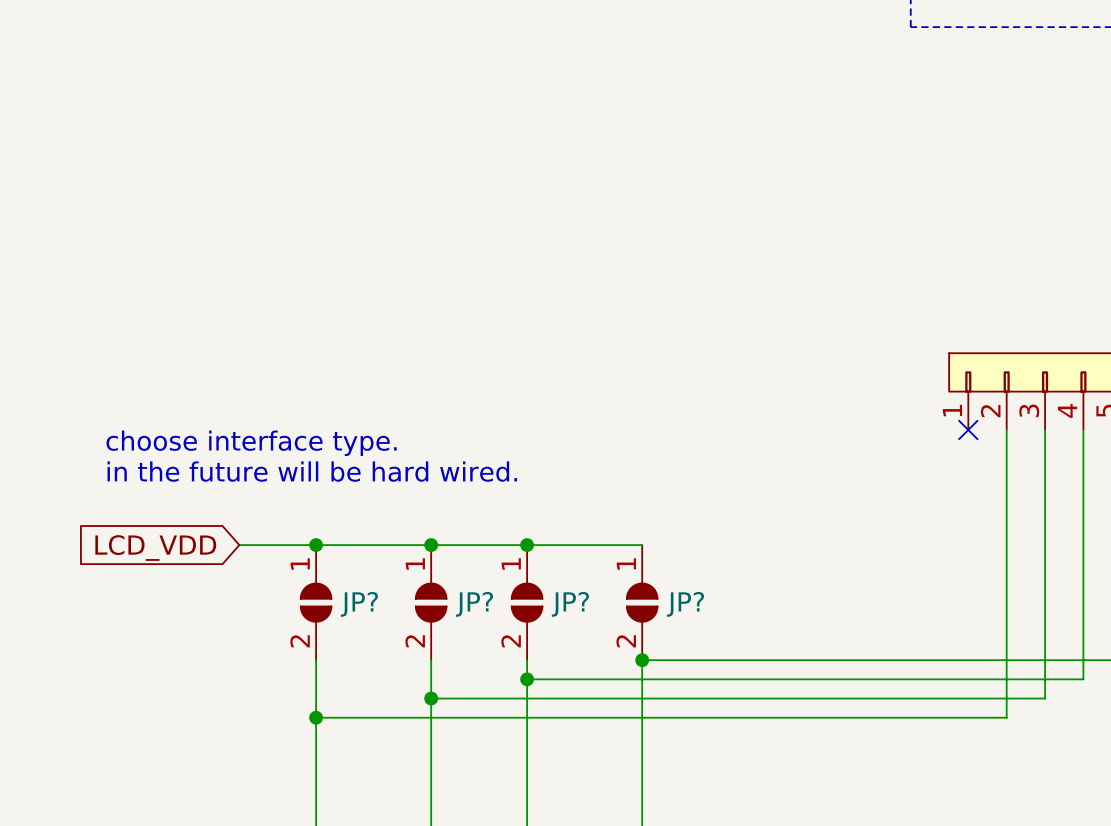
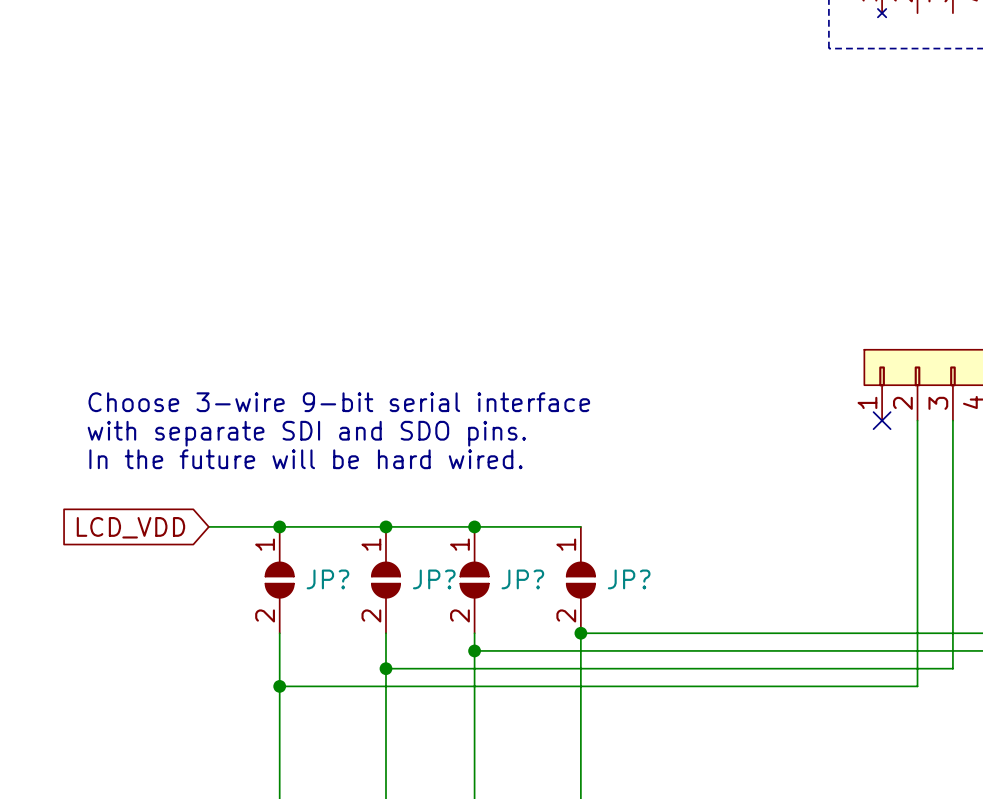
text: none -> Choose 3-wire 9-bit serial interface (339, 402)
text: choose interface type. (251, 443) -> with separate SDI and SDO pins. (306, 433)
text: in the future will be hard wired. (312, 471) -> In the future will be hard wired. (305, 459)

